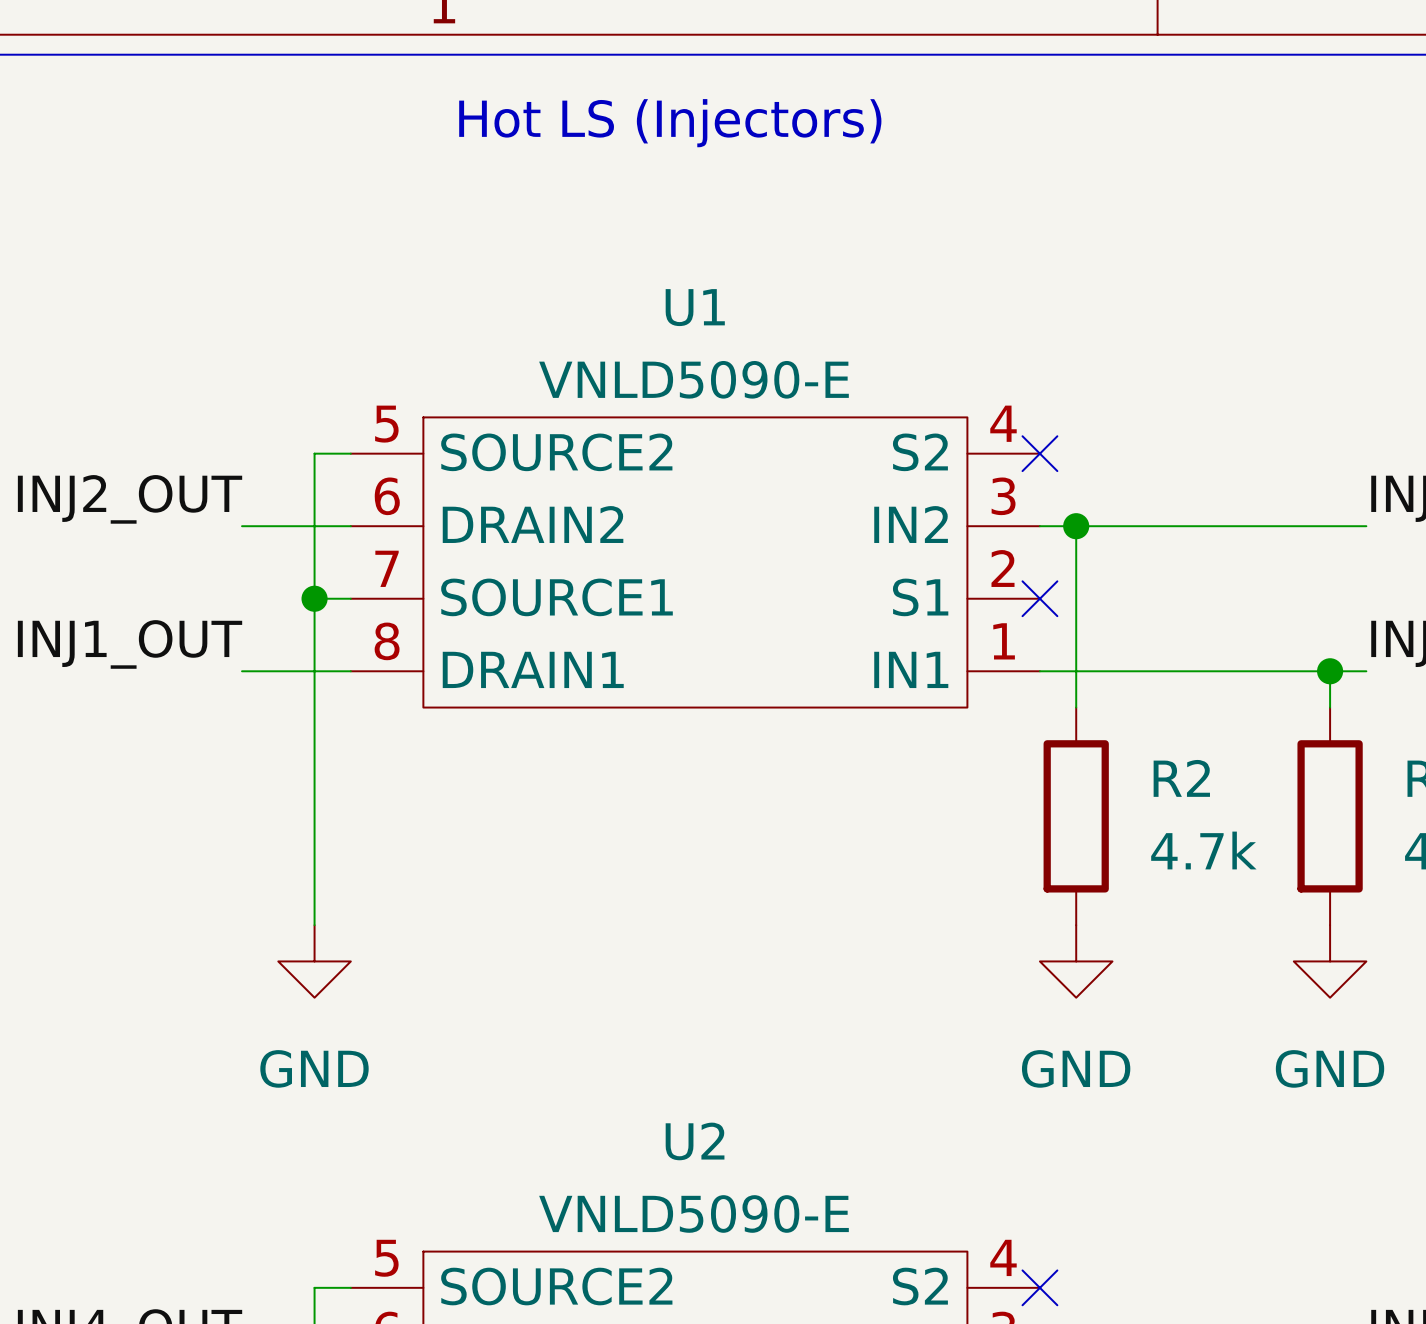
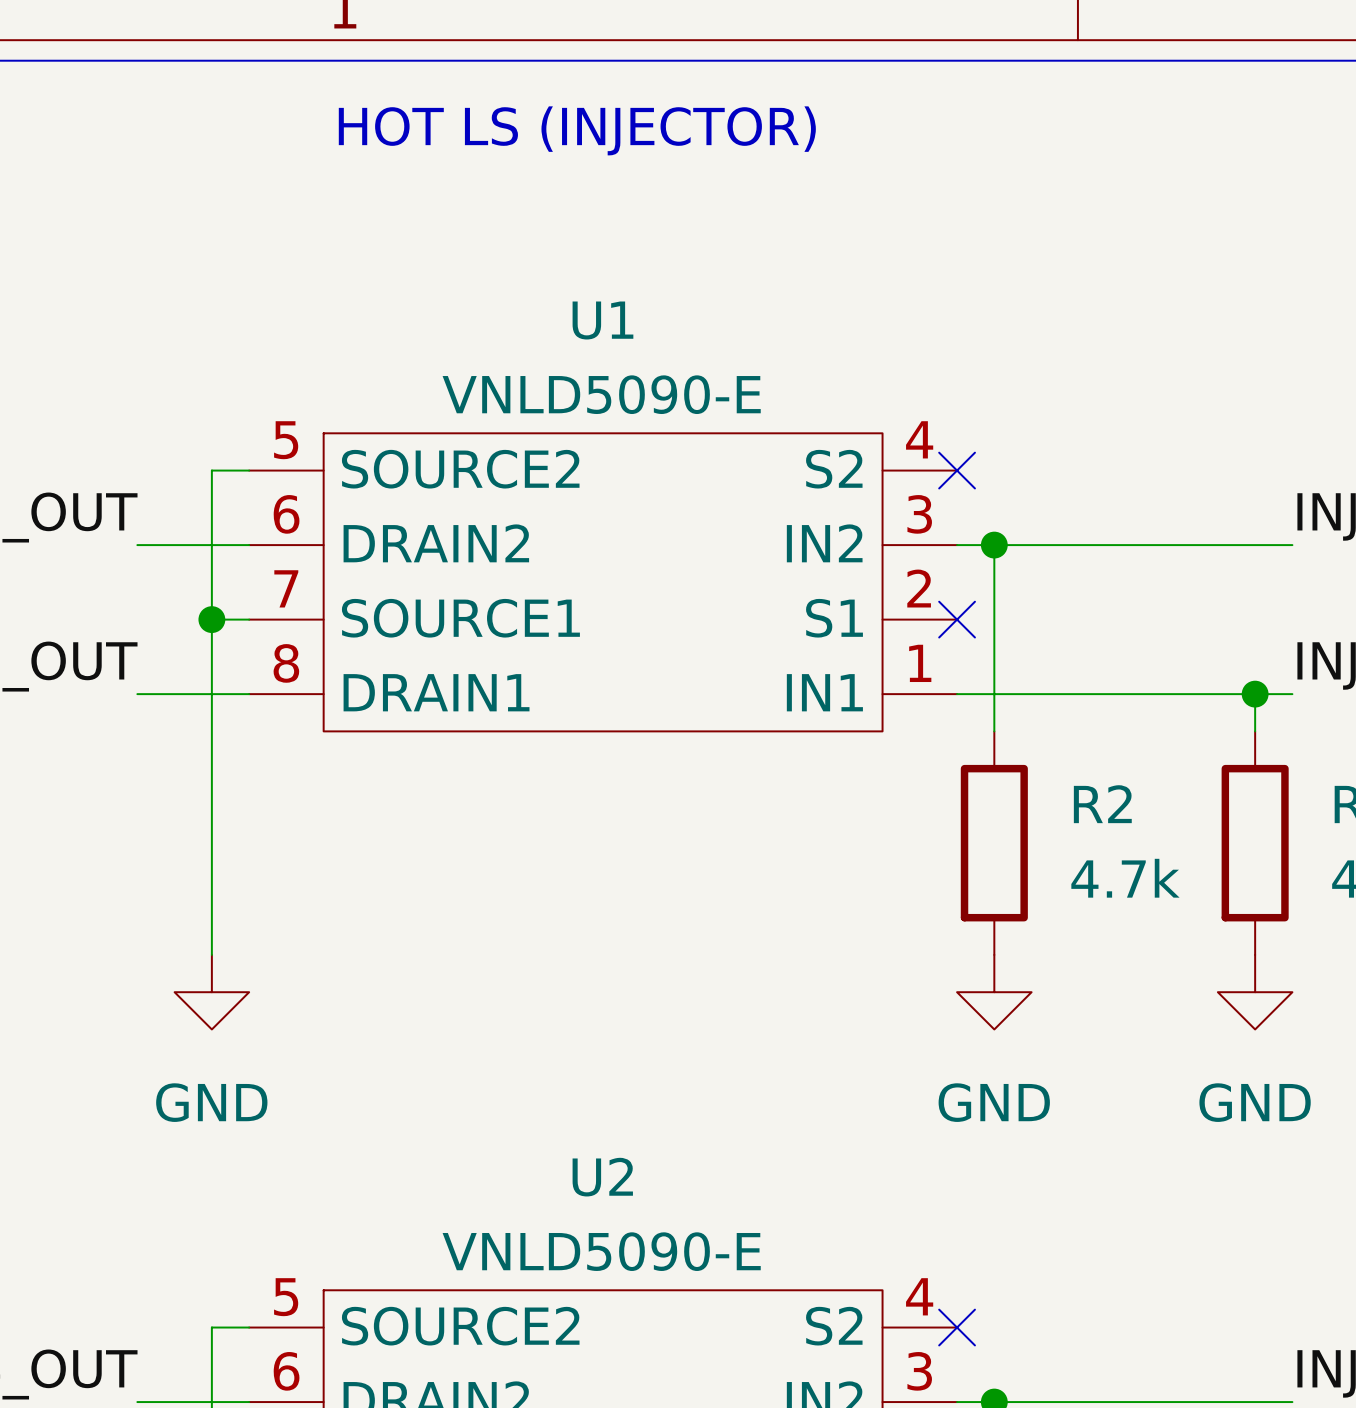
text: Hot LS (Injectors) (670, 123) -> HOT LS (INJECTOR) (577, 130)

